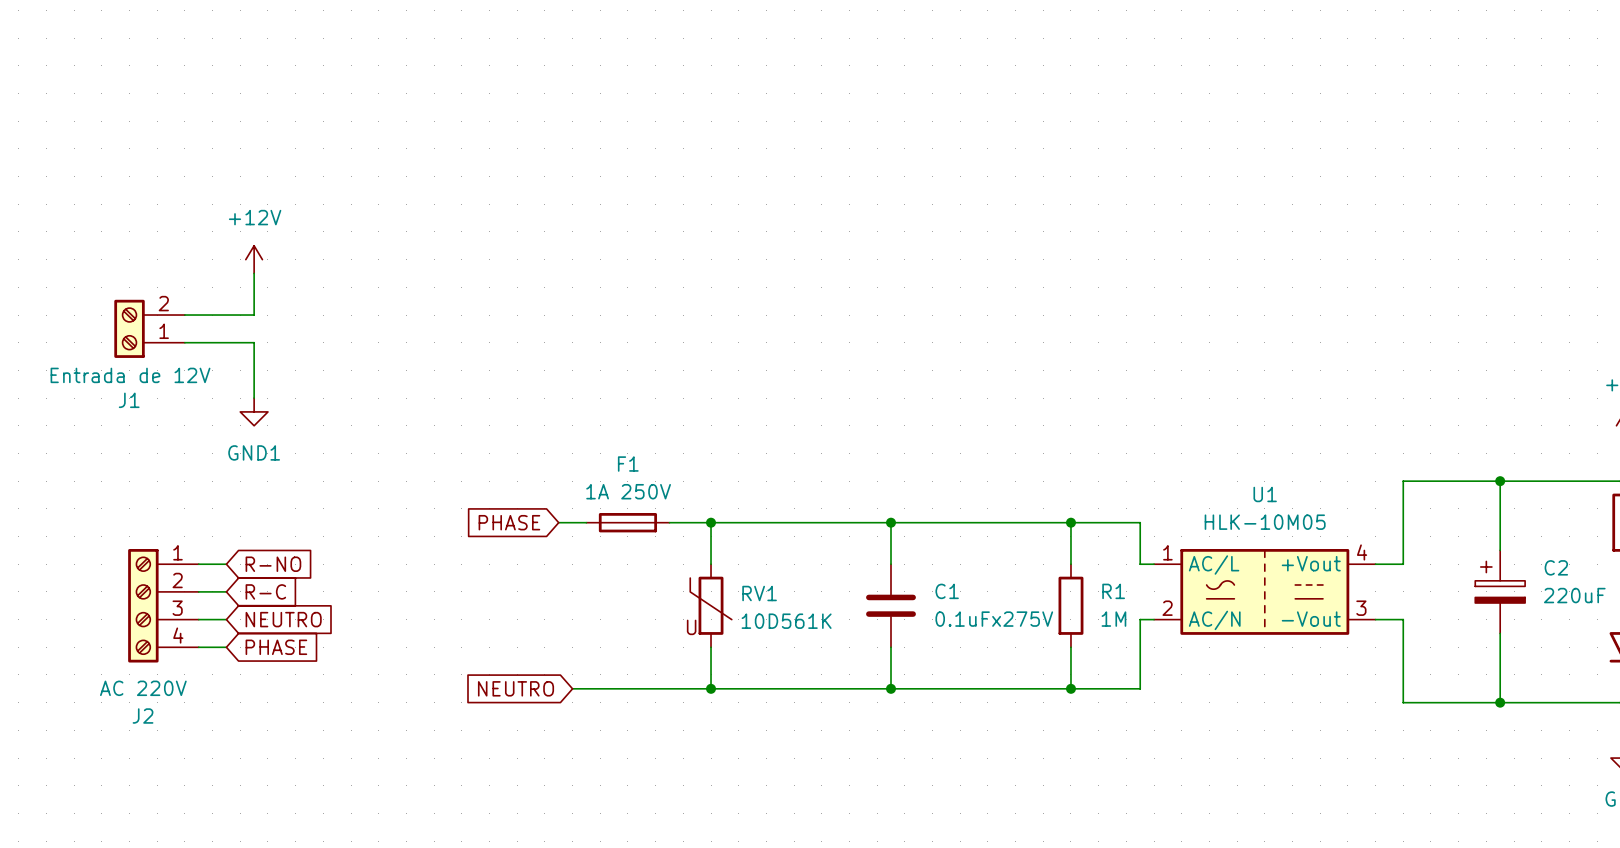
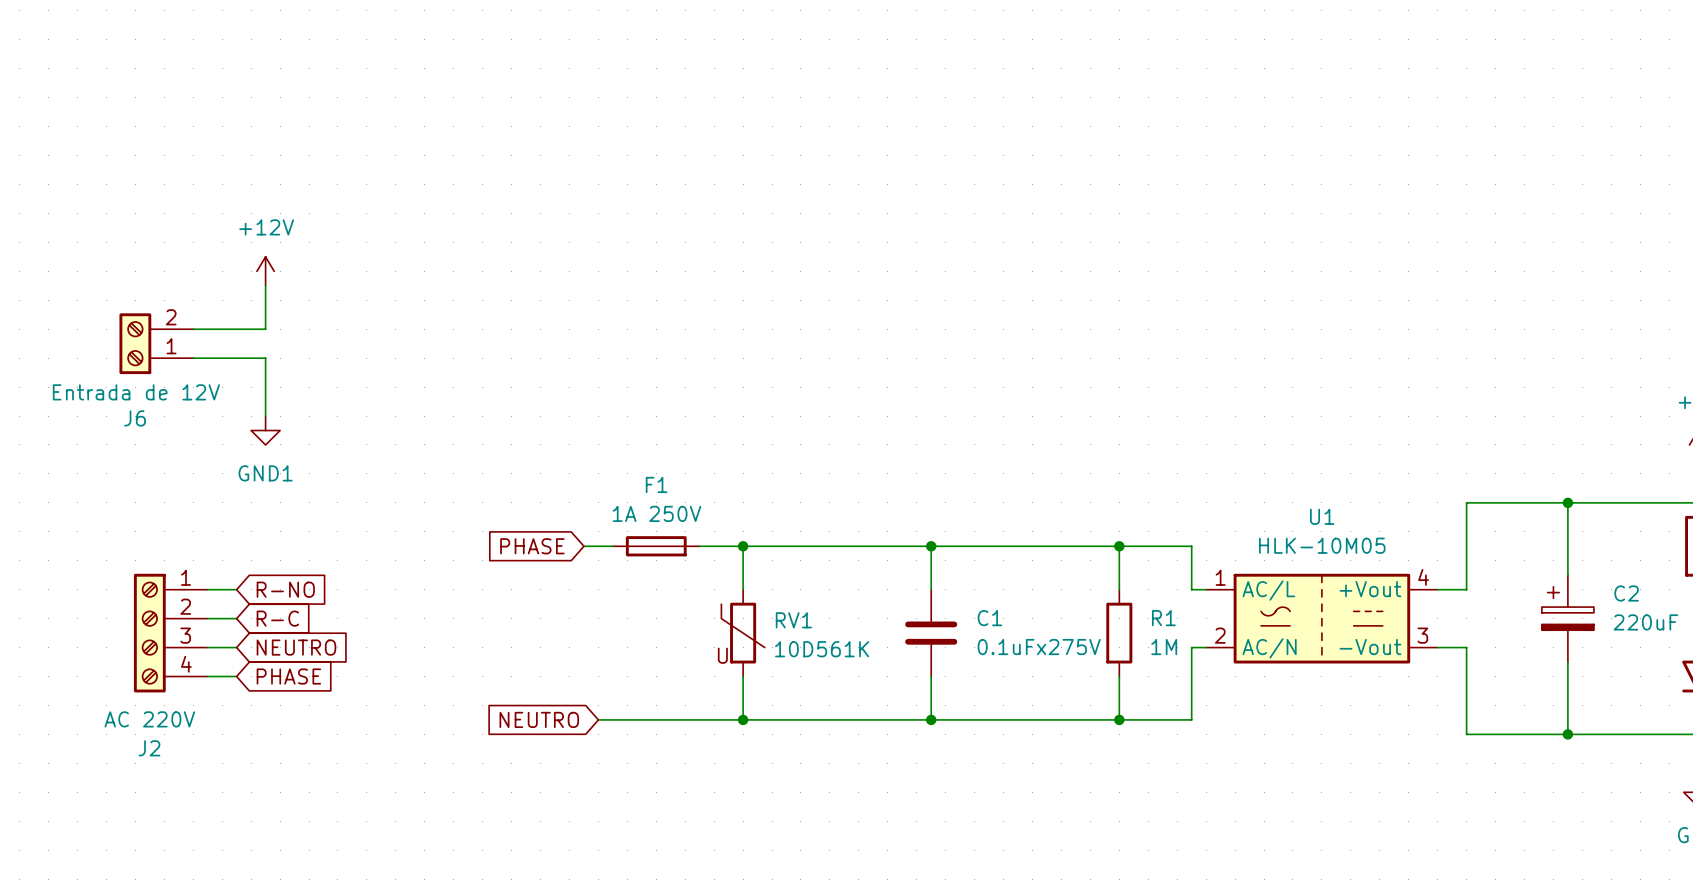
J1 name: J1 (129, 400) -> J6 (135, 418)

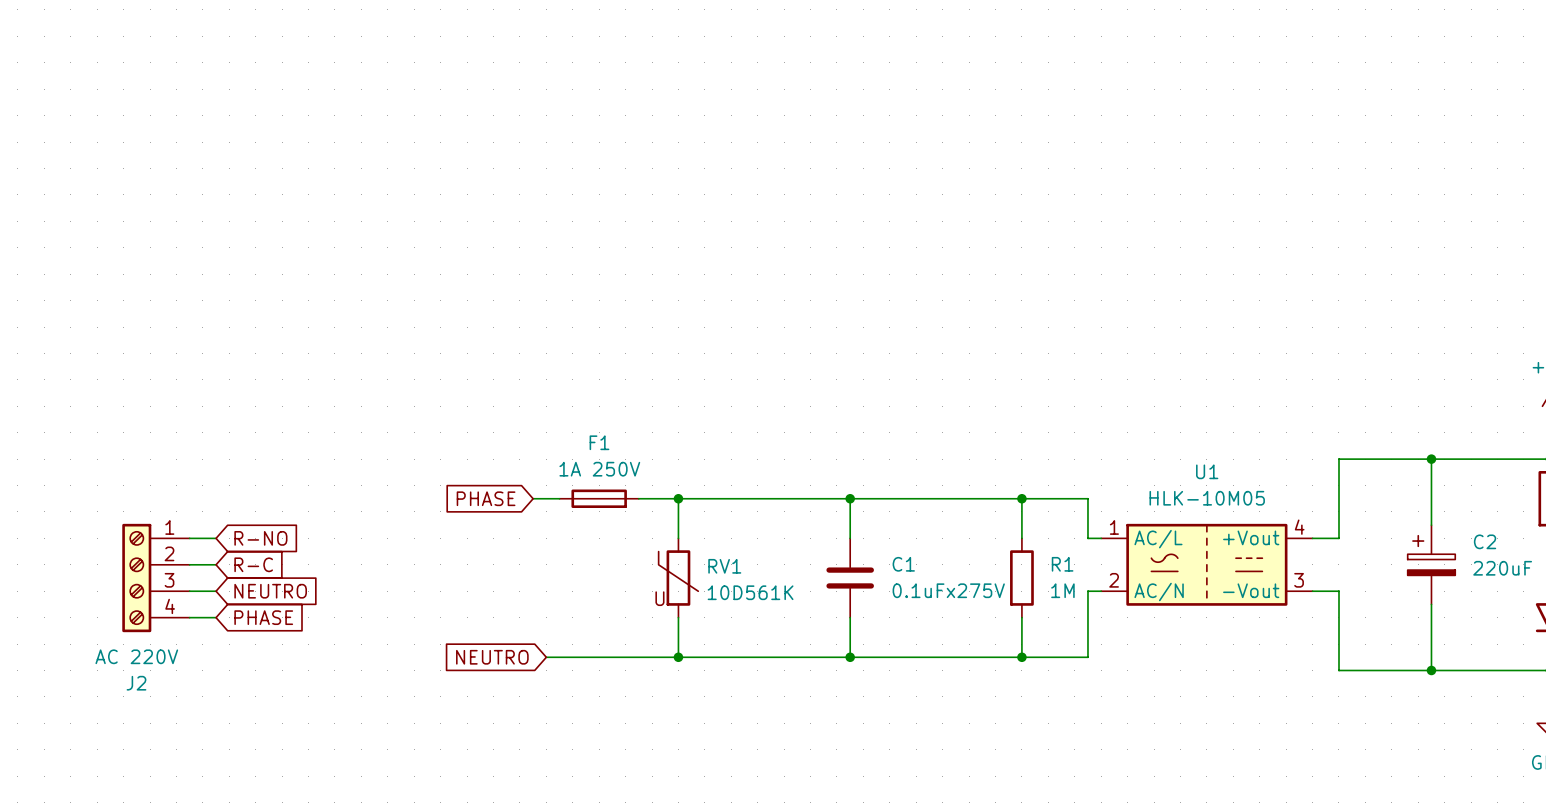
power symbol: +12V (265, 271) -> none
wire: (265, 285) (265, 329) (193, 329) -> none
J6: Entrada de 12V (156, 343) -> none
wire: (193, 358) (265, 358) (265, 416) -> none
power symbol: GND1 (265, 430) -> none

